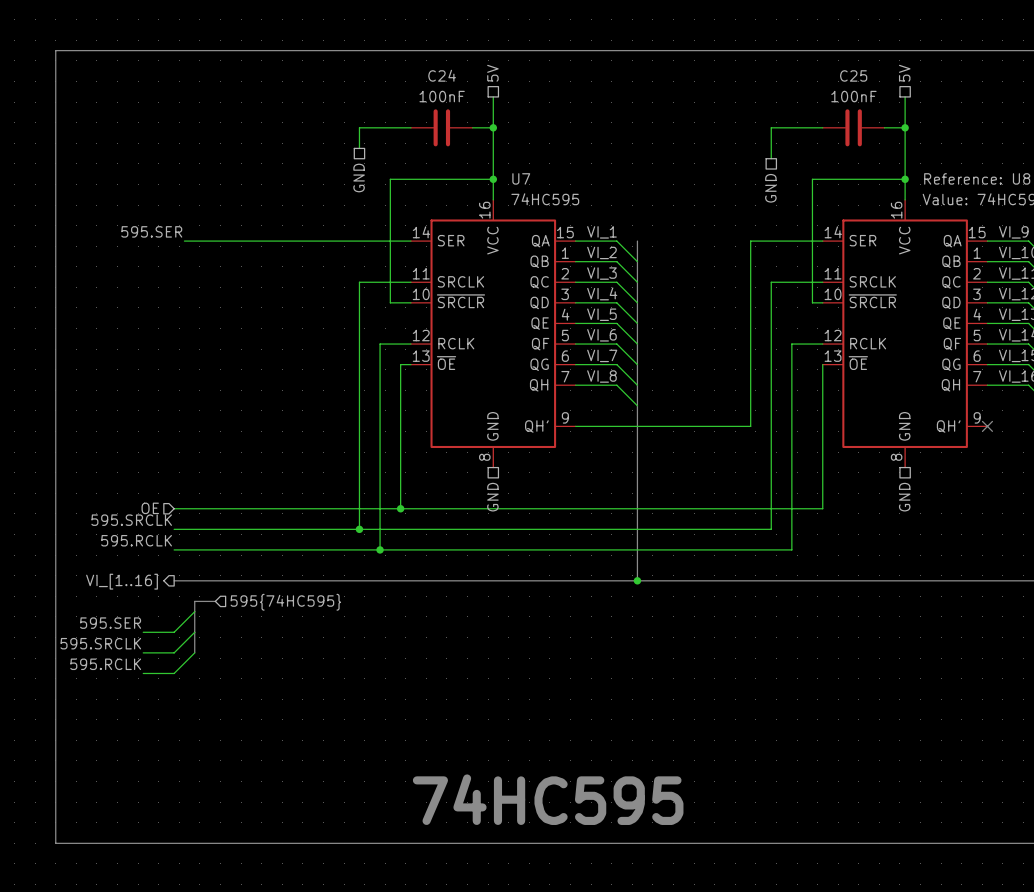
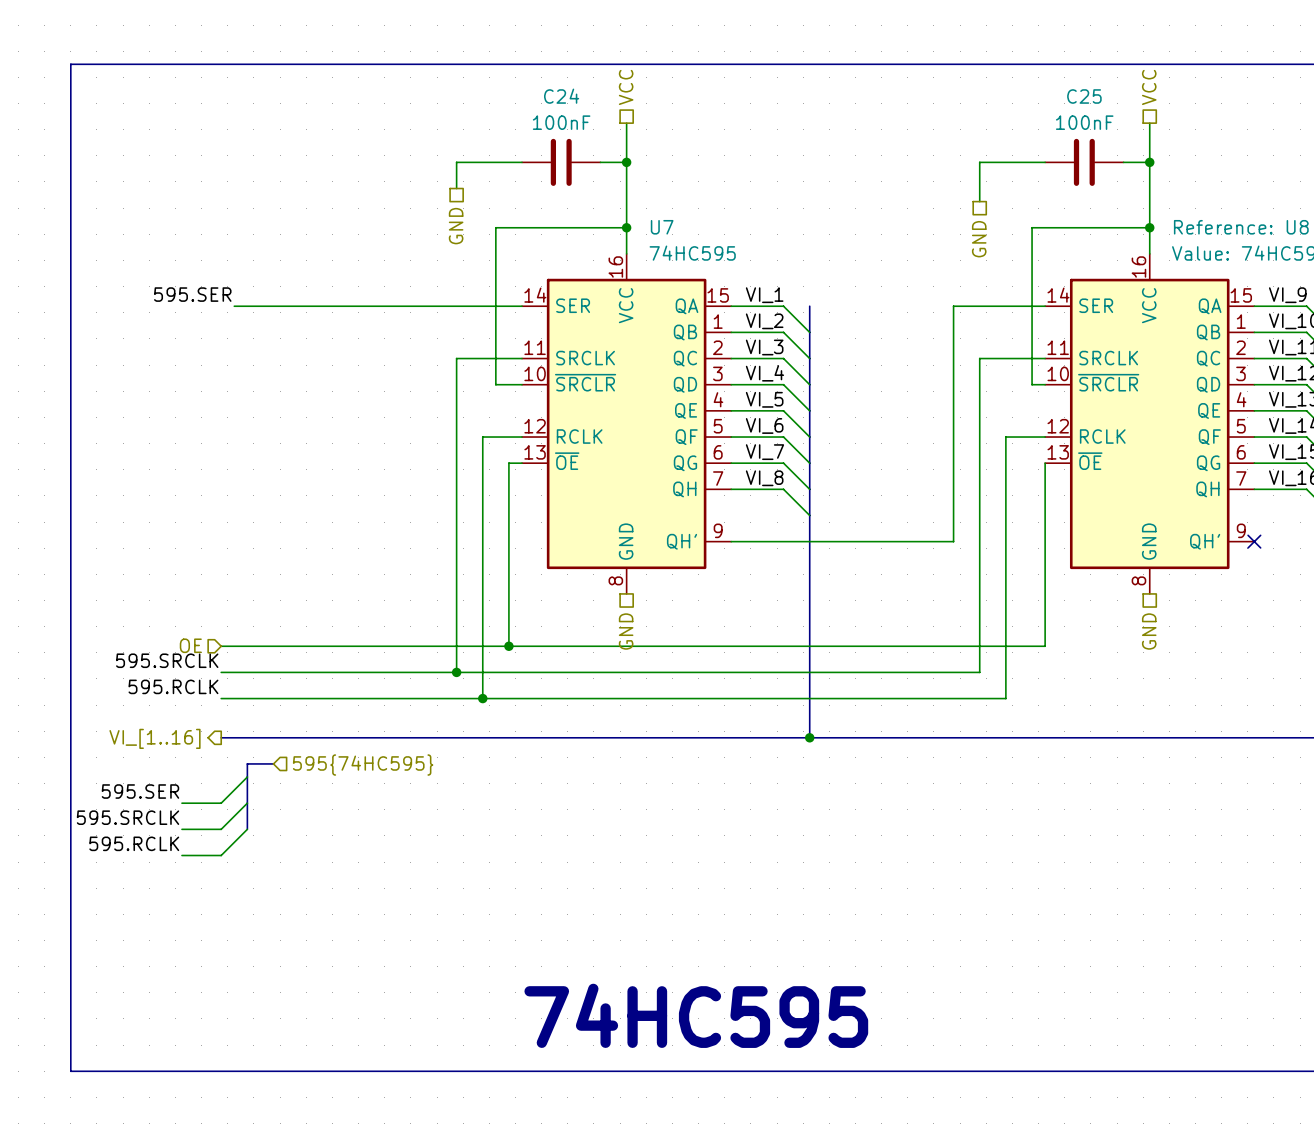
hierarchical label: 5V (492, 73) -> VCC (626, 87)
hierarchical label: 5V (904, 73) -> VCC (1149, 87)

